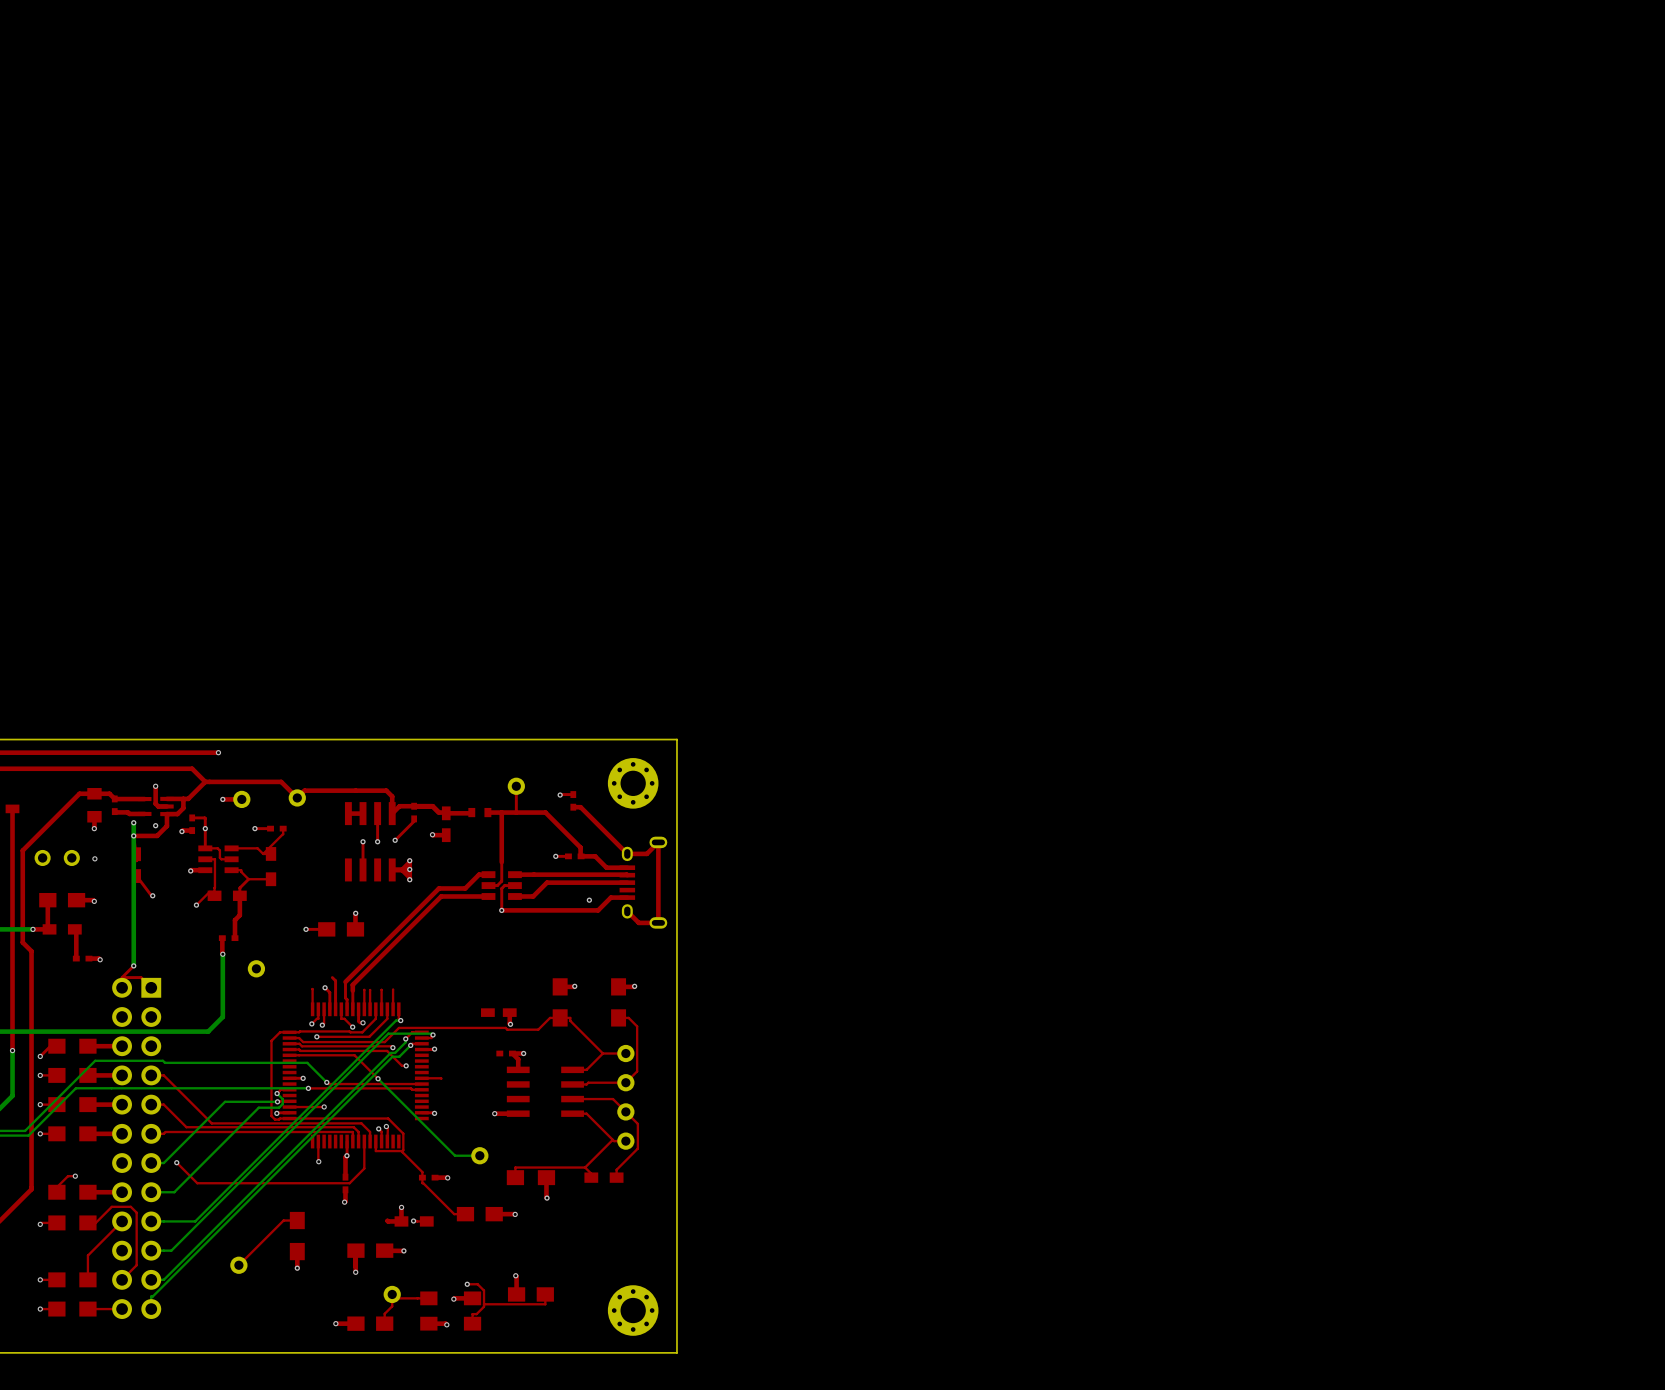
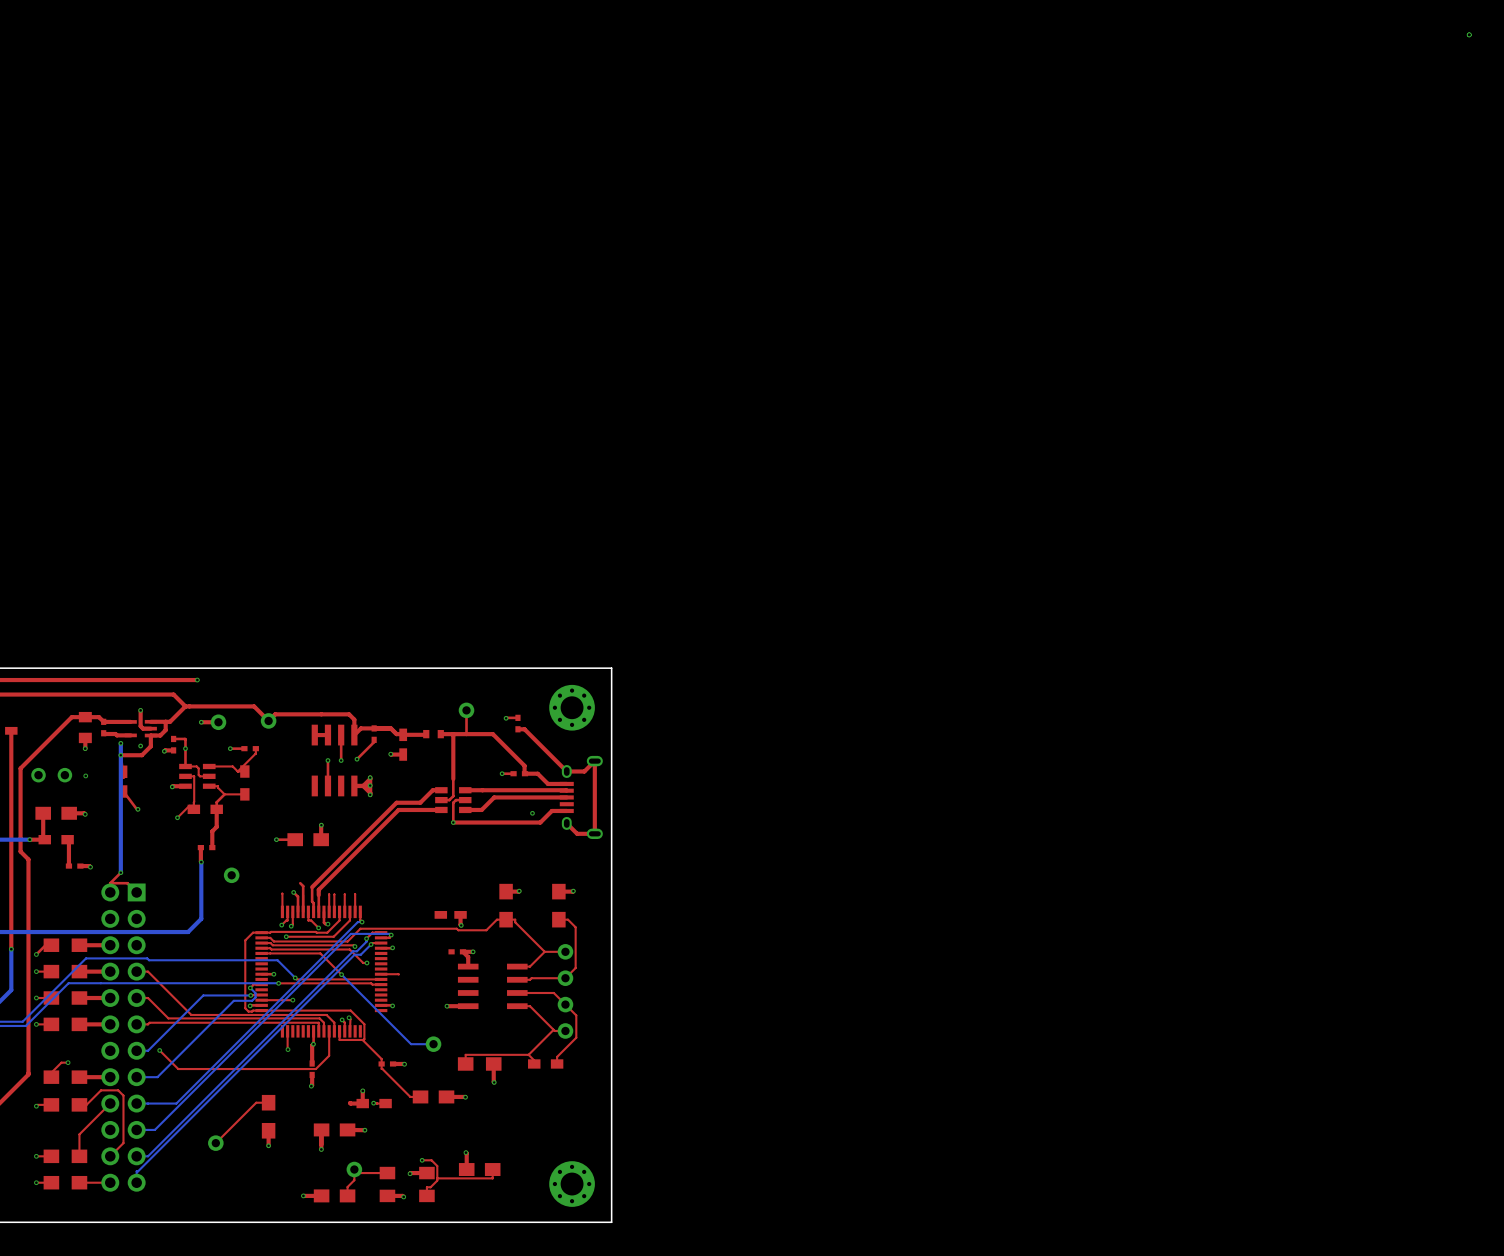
part: none -> (1469, 34)

